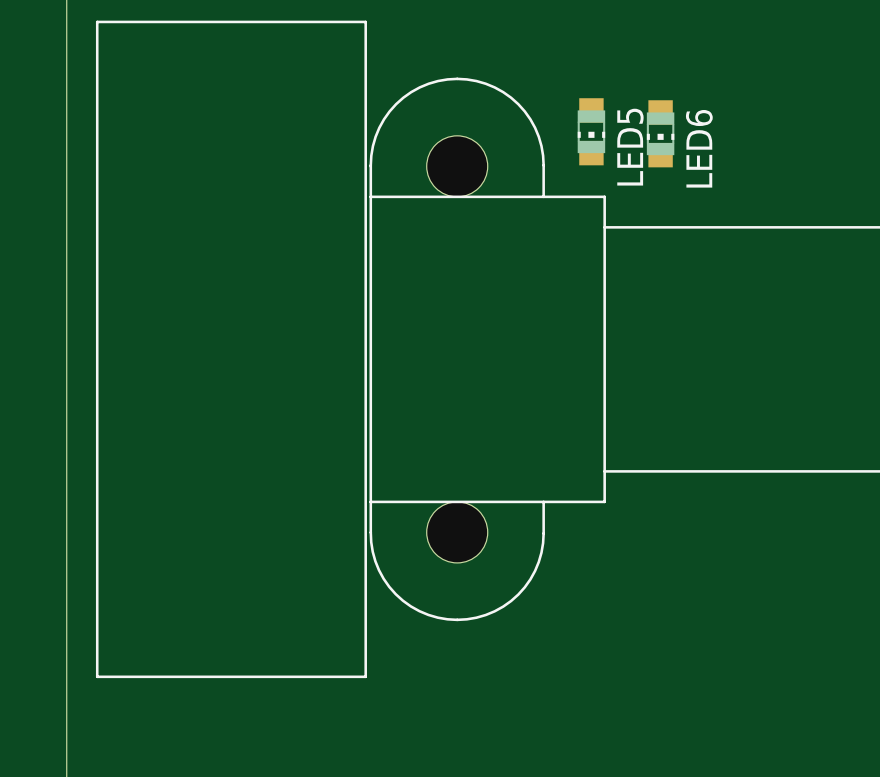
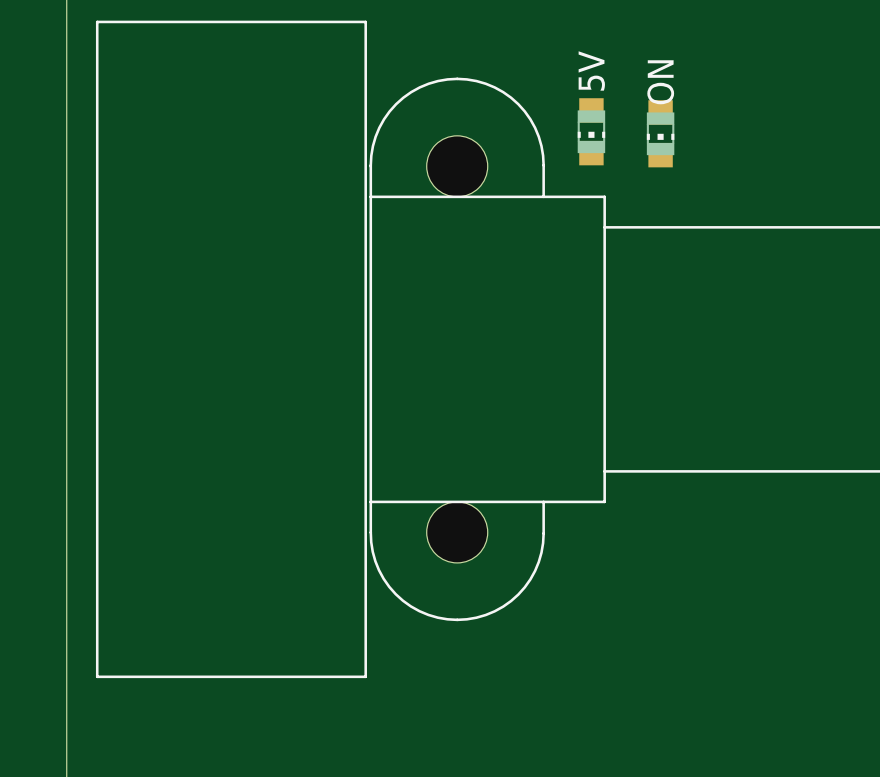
LED5 name: LED5 (630, 147) -> 5V (591, 70)
LED6 name: LED6 (699, 148) -> ON (660, 82)

